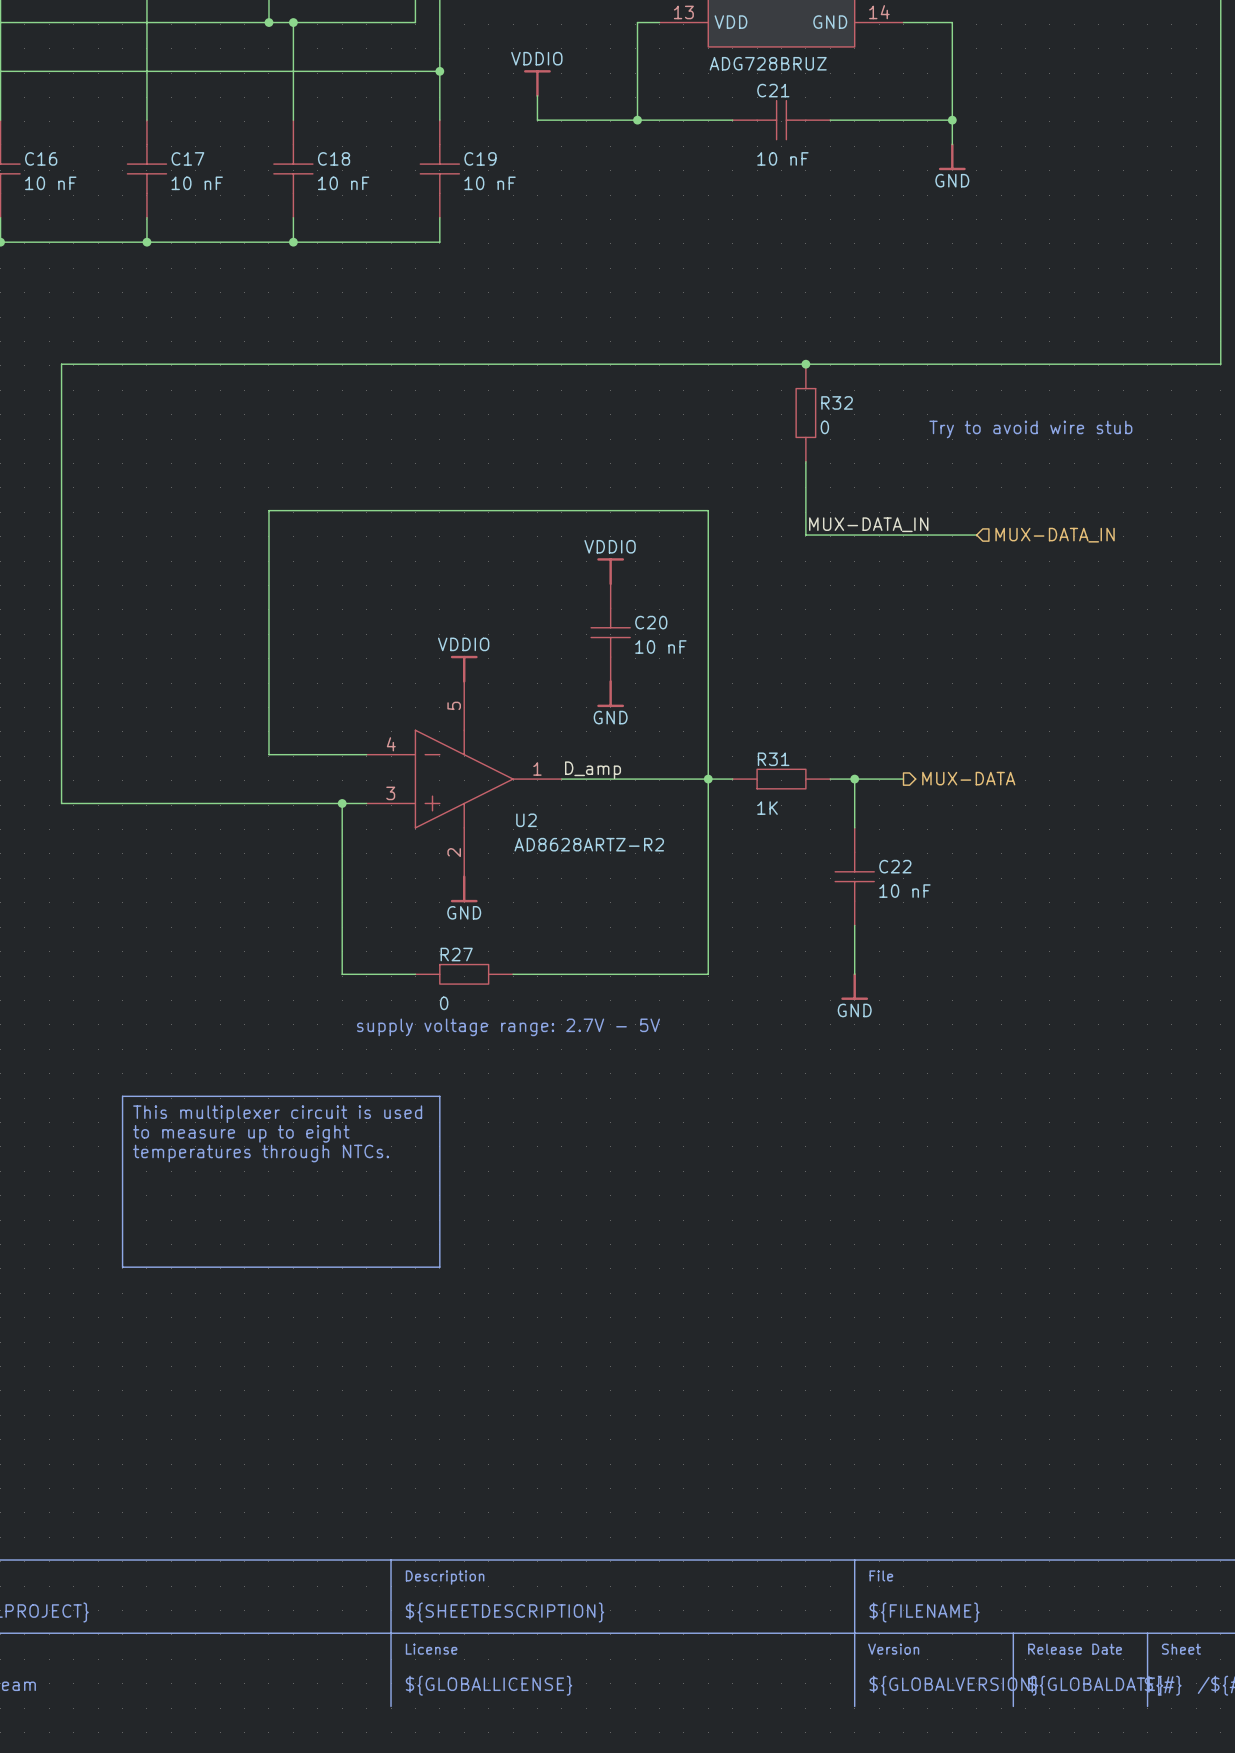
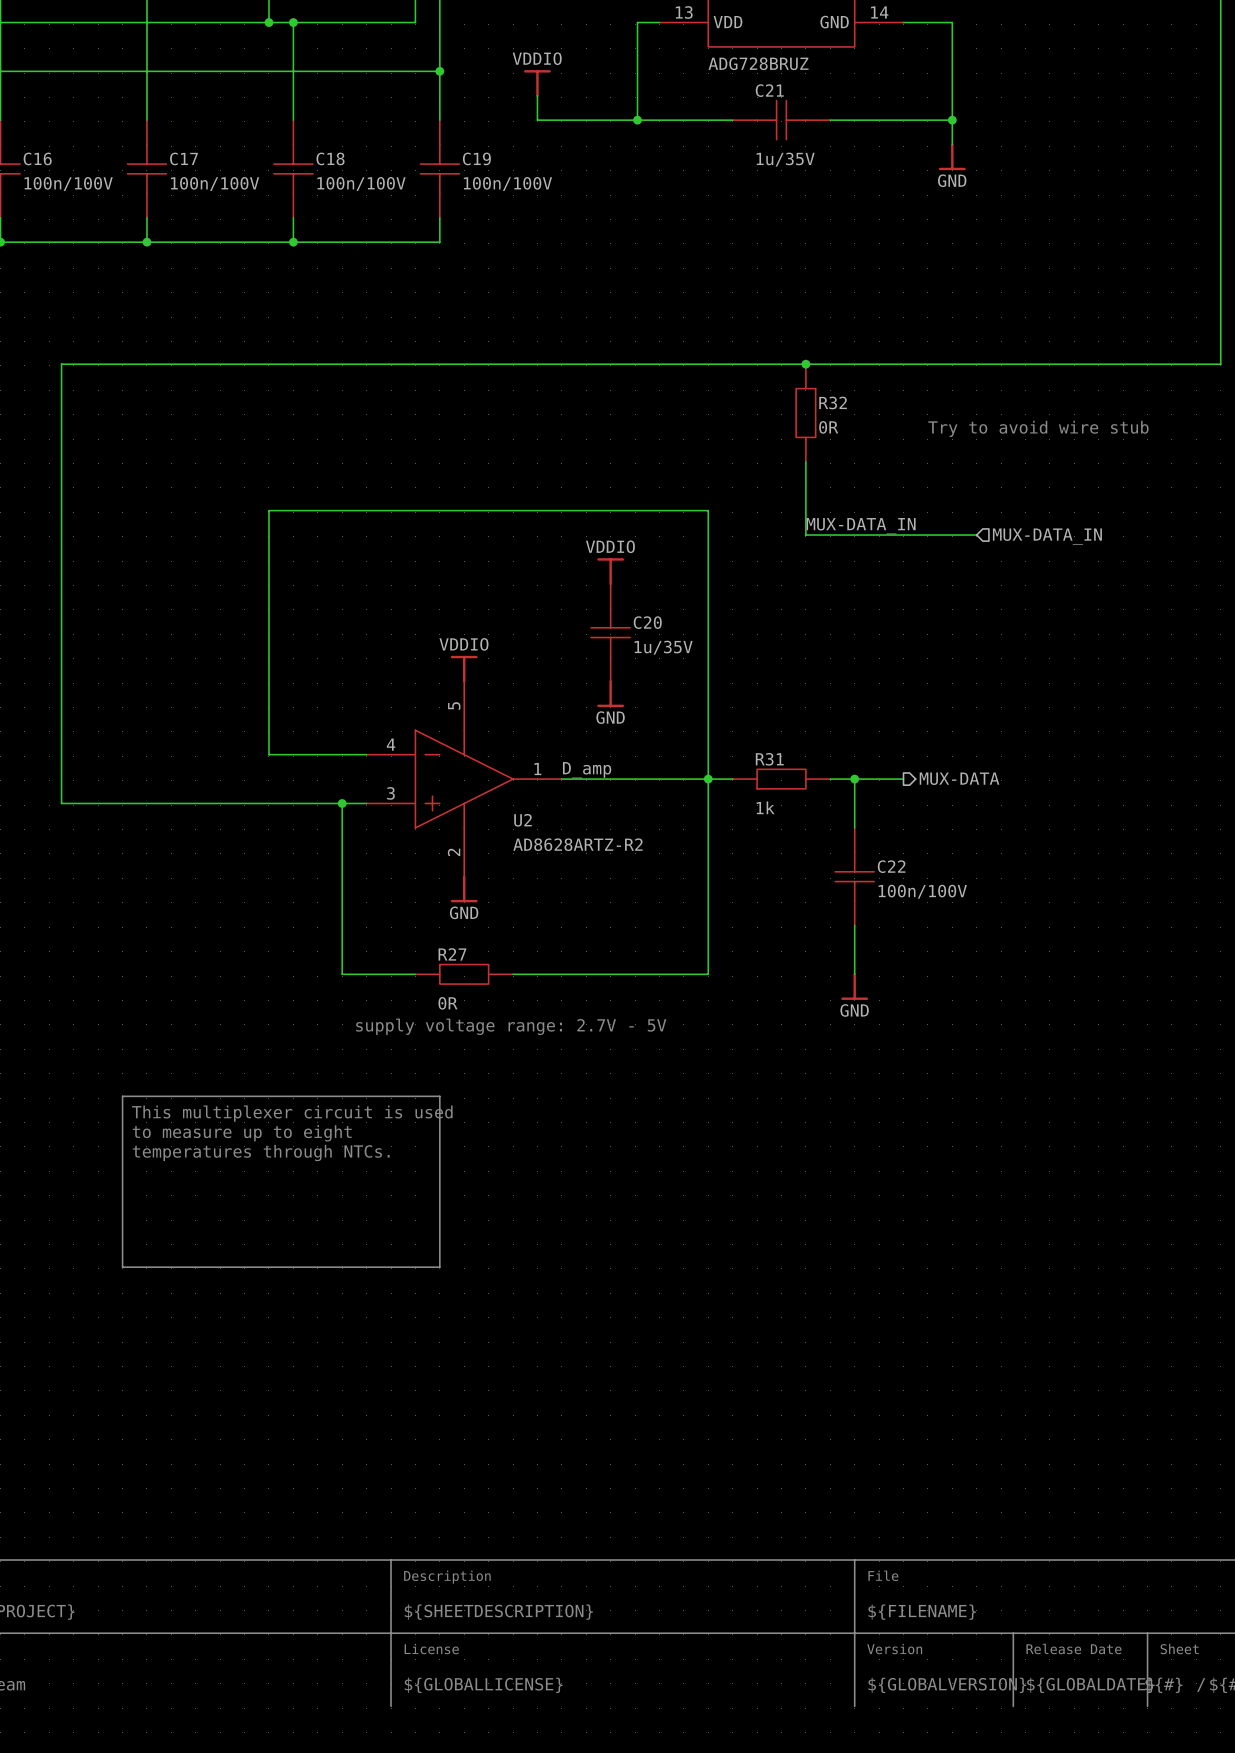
C21 value: 10 nF (782, 158) -> 1u/35V (785, 159)
C16 value: 10 nF (50, 183) -> 100n/100V (68, 184)
C17 value: 10 nF (197, 183) -> 100n/100V (215, 184)
C18 value: 10 nF (343, 183) -> 100n/100V (361, 184)
C19 value: 10 nF (490, 183) -> 100n/100V (507, 184)
R32 value: 0 (824, 427) -> 0R (828, 427)
C20 value: 10 nF (660, 647) -> 1u/35V (663, 647)
R31 value: 1K (767, 808) -> 1k (765, 807)
C22 value: 10 nF (904, 891) -> 100n/100V (922, 891)
R27 value: 0 (444, 1003) -> 0R (448, 1003)

